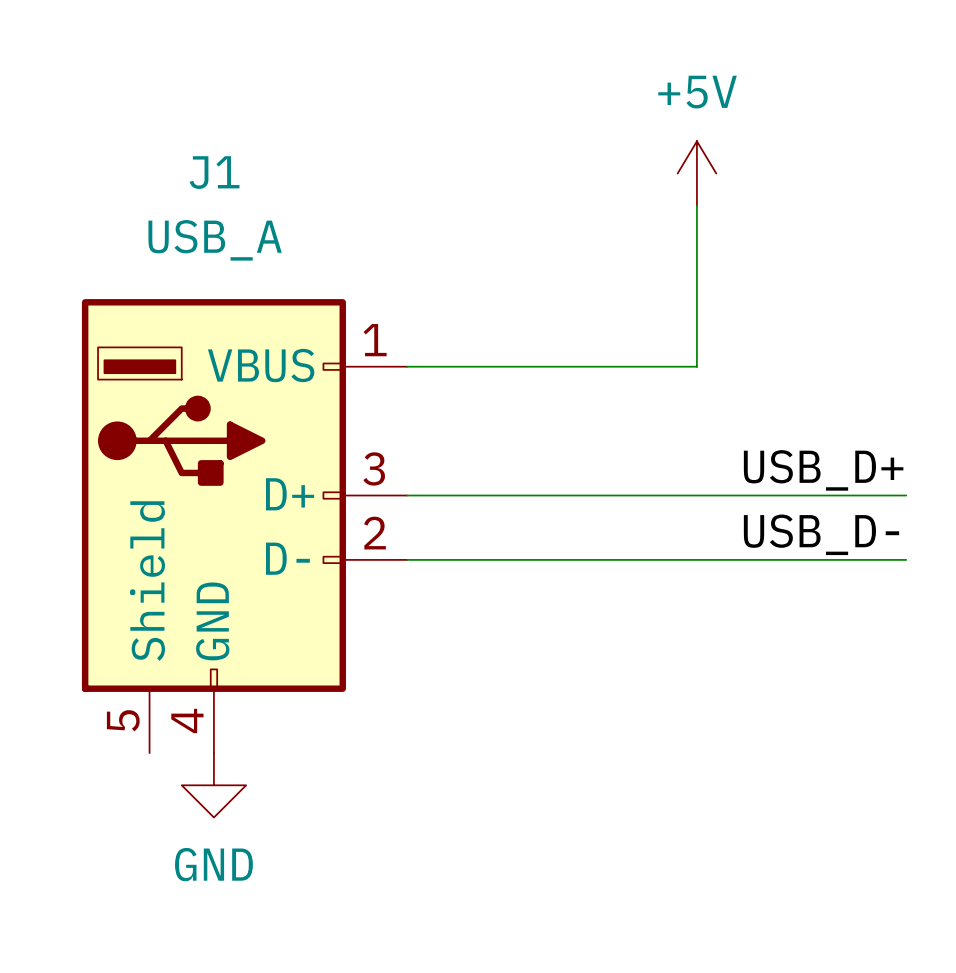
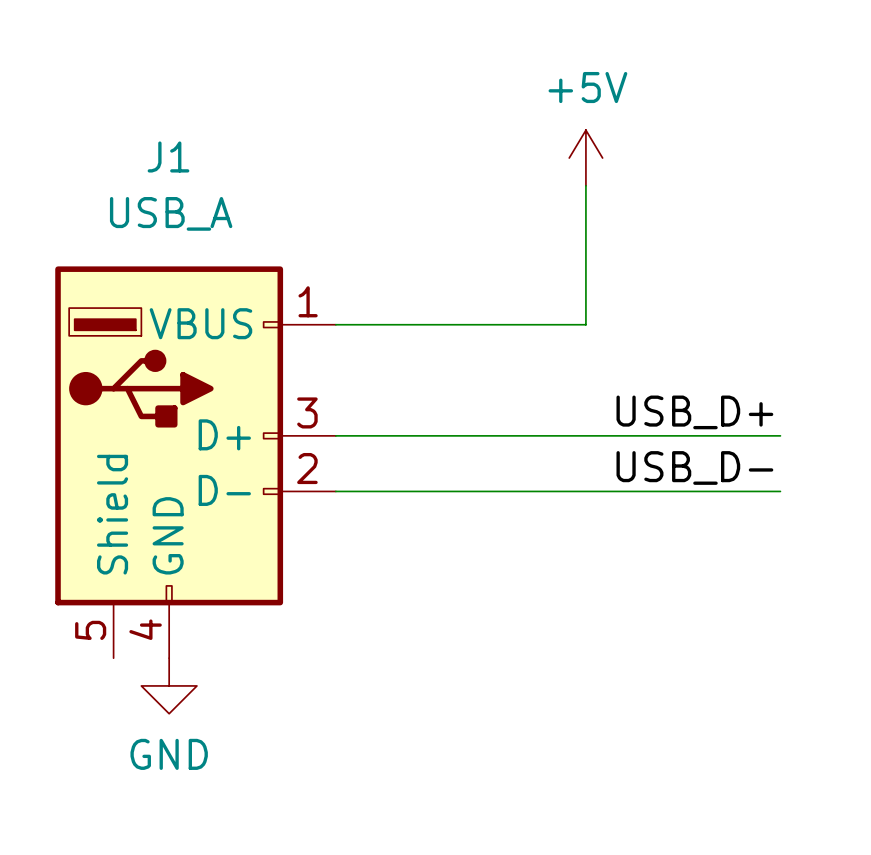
label position: USB_D+ (823, 470) -> USB_D+ (694, 412)
wire: none -> (766, 435) (780, 435)
label position: USB_D- (821, 534) -> USB_D- (694, 467)
wire: none -> (766, 491) (780, 491)

